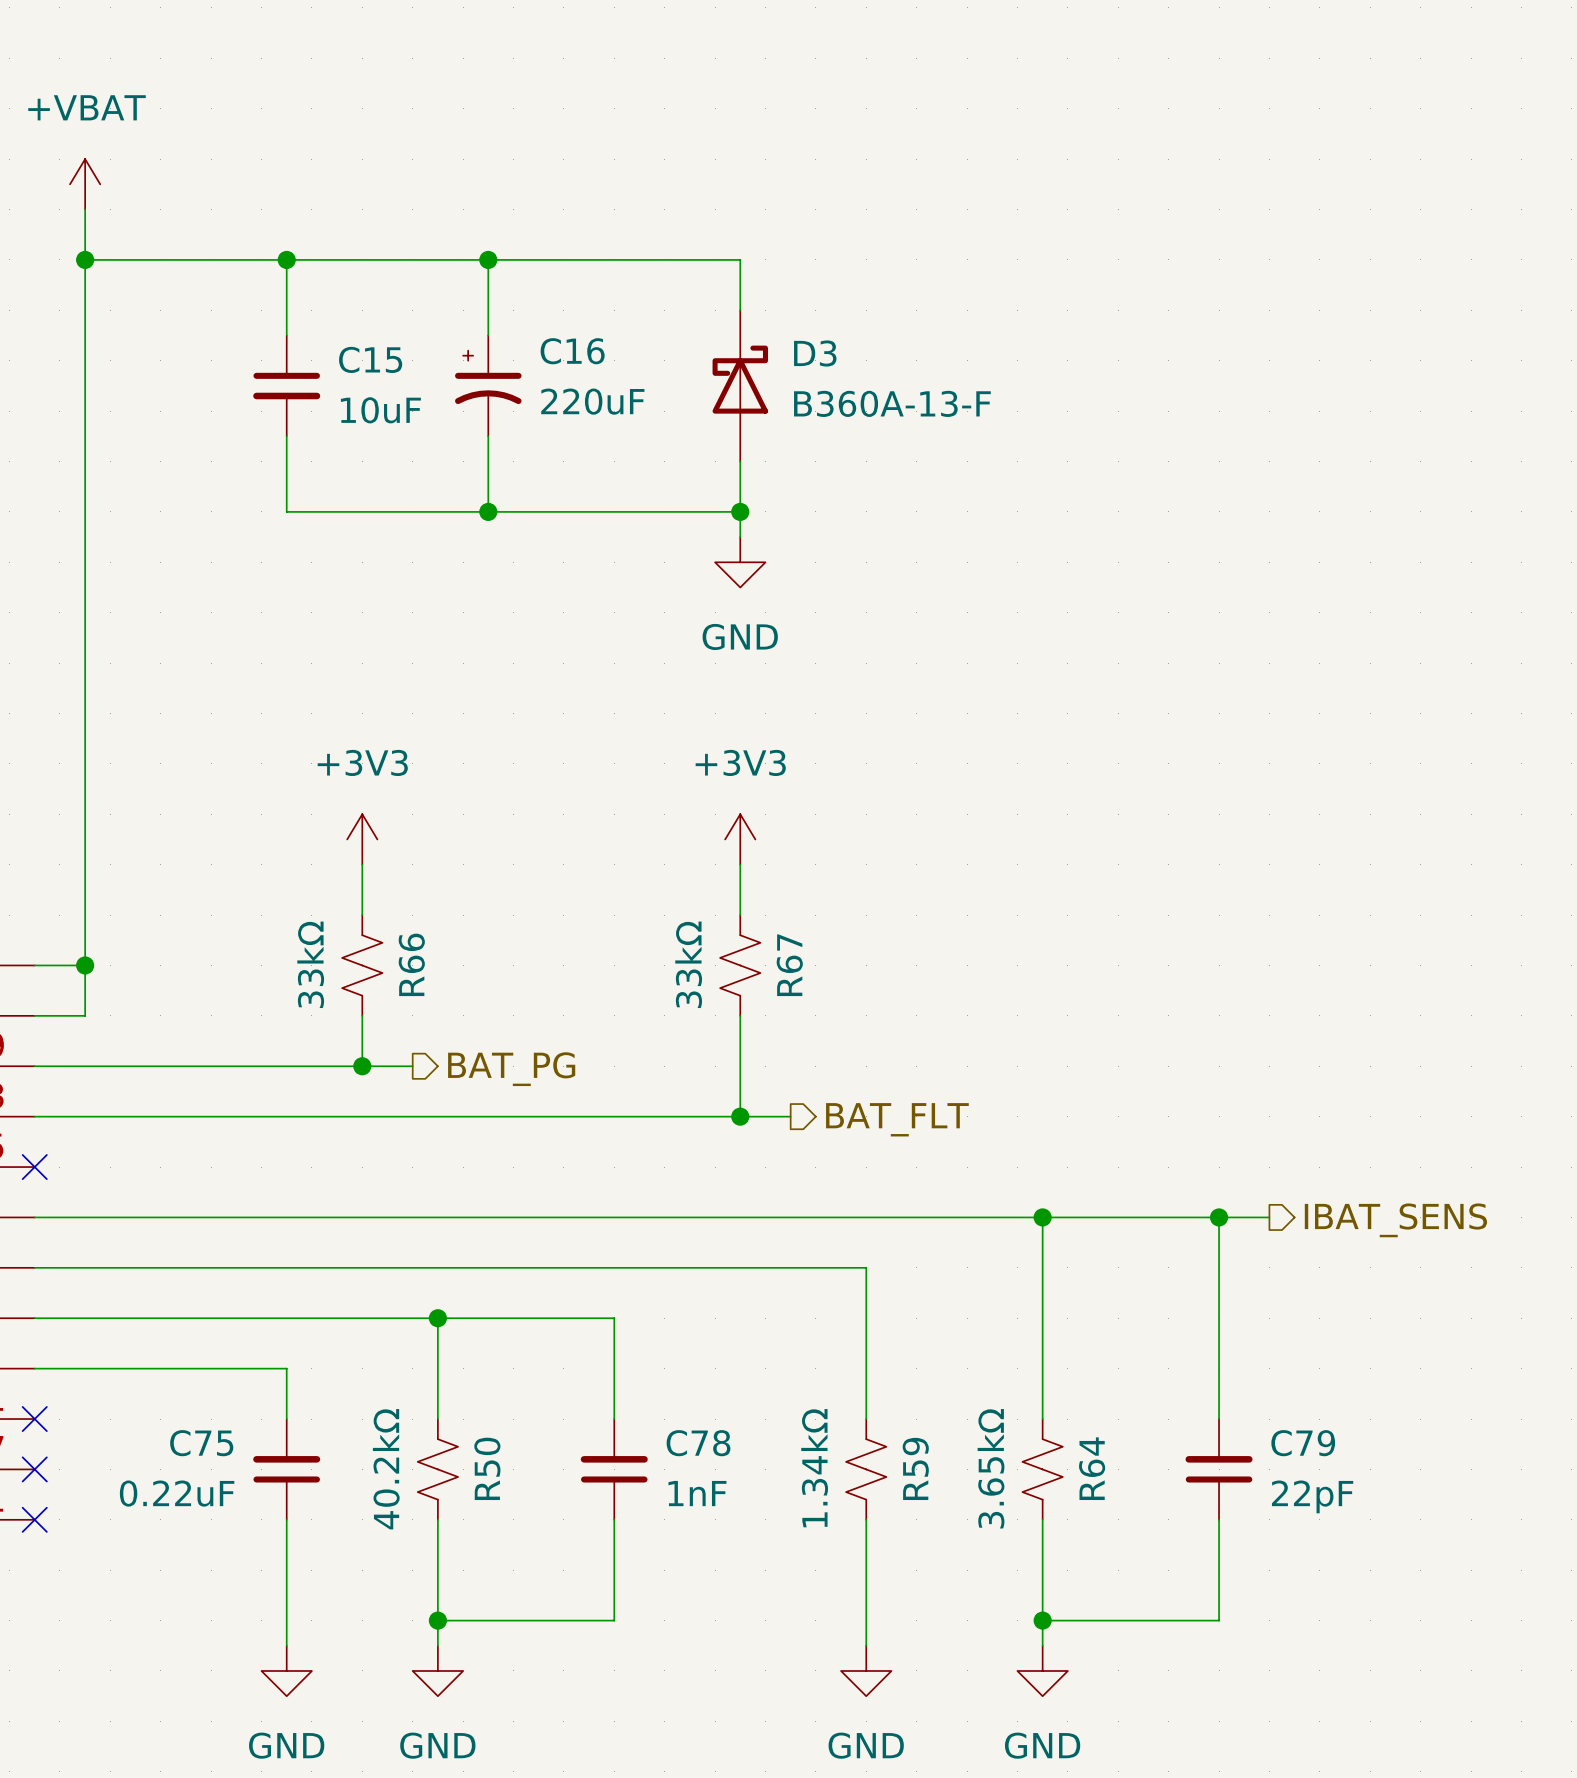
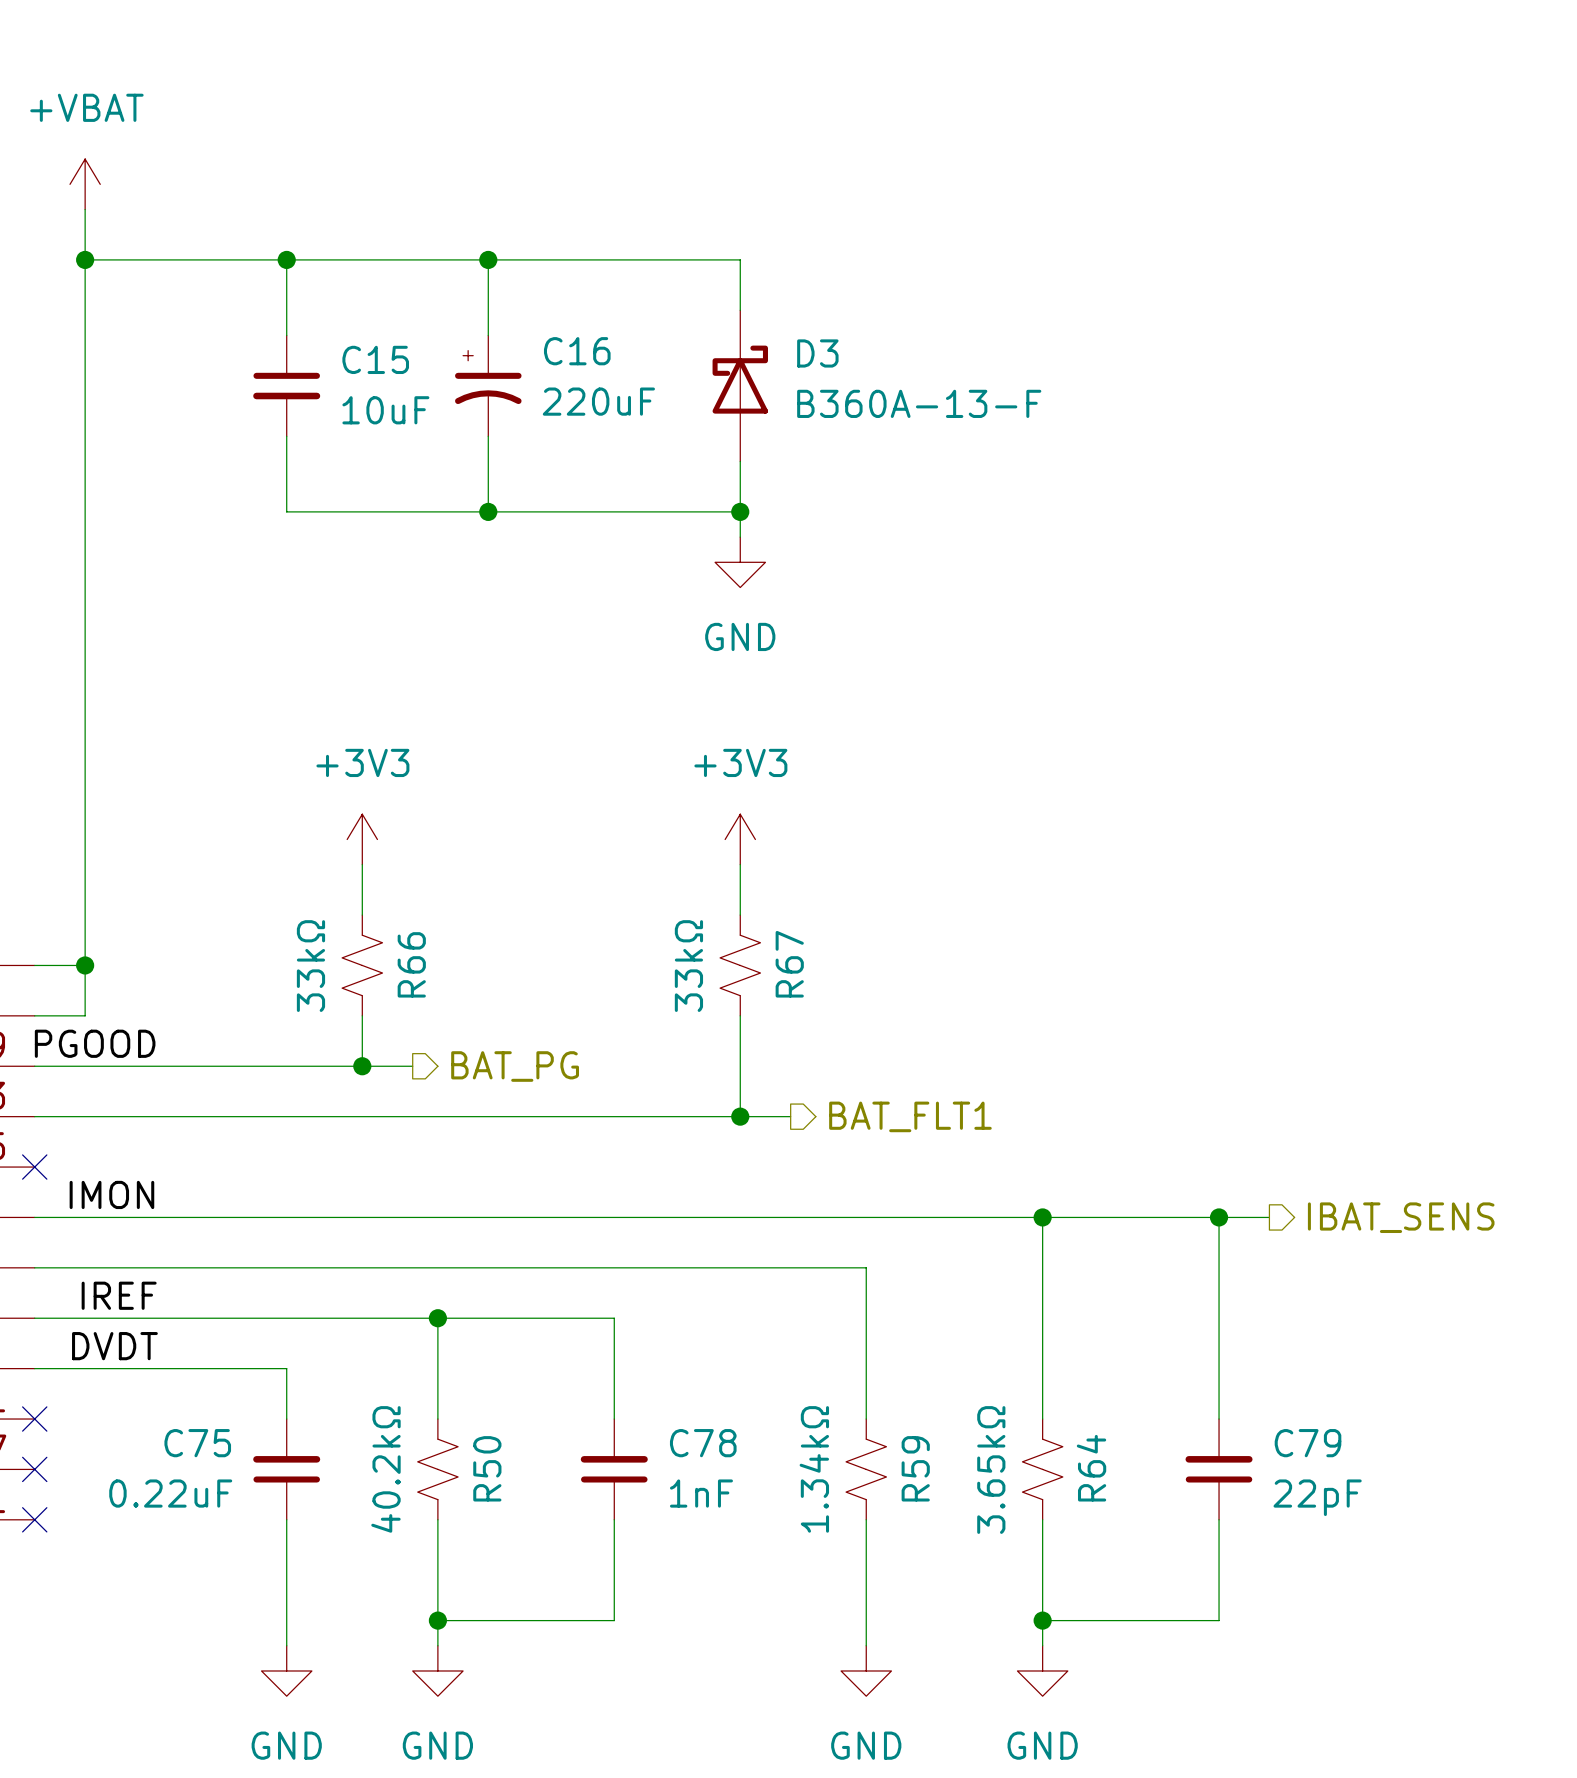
label: none -> PGOOD (95, 1043)
hierarchical label: BAT_FLT (897, 1119) -> BAT_FLT1 (910, 1116)
label: none -> IMON (111, 1194)
label: none -> IREF (119, 1295)
label: none -> DVDT (114, 1346)

